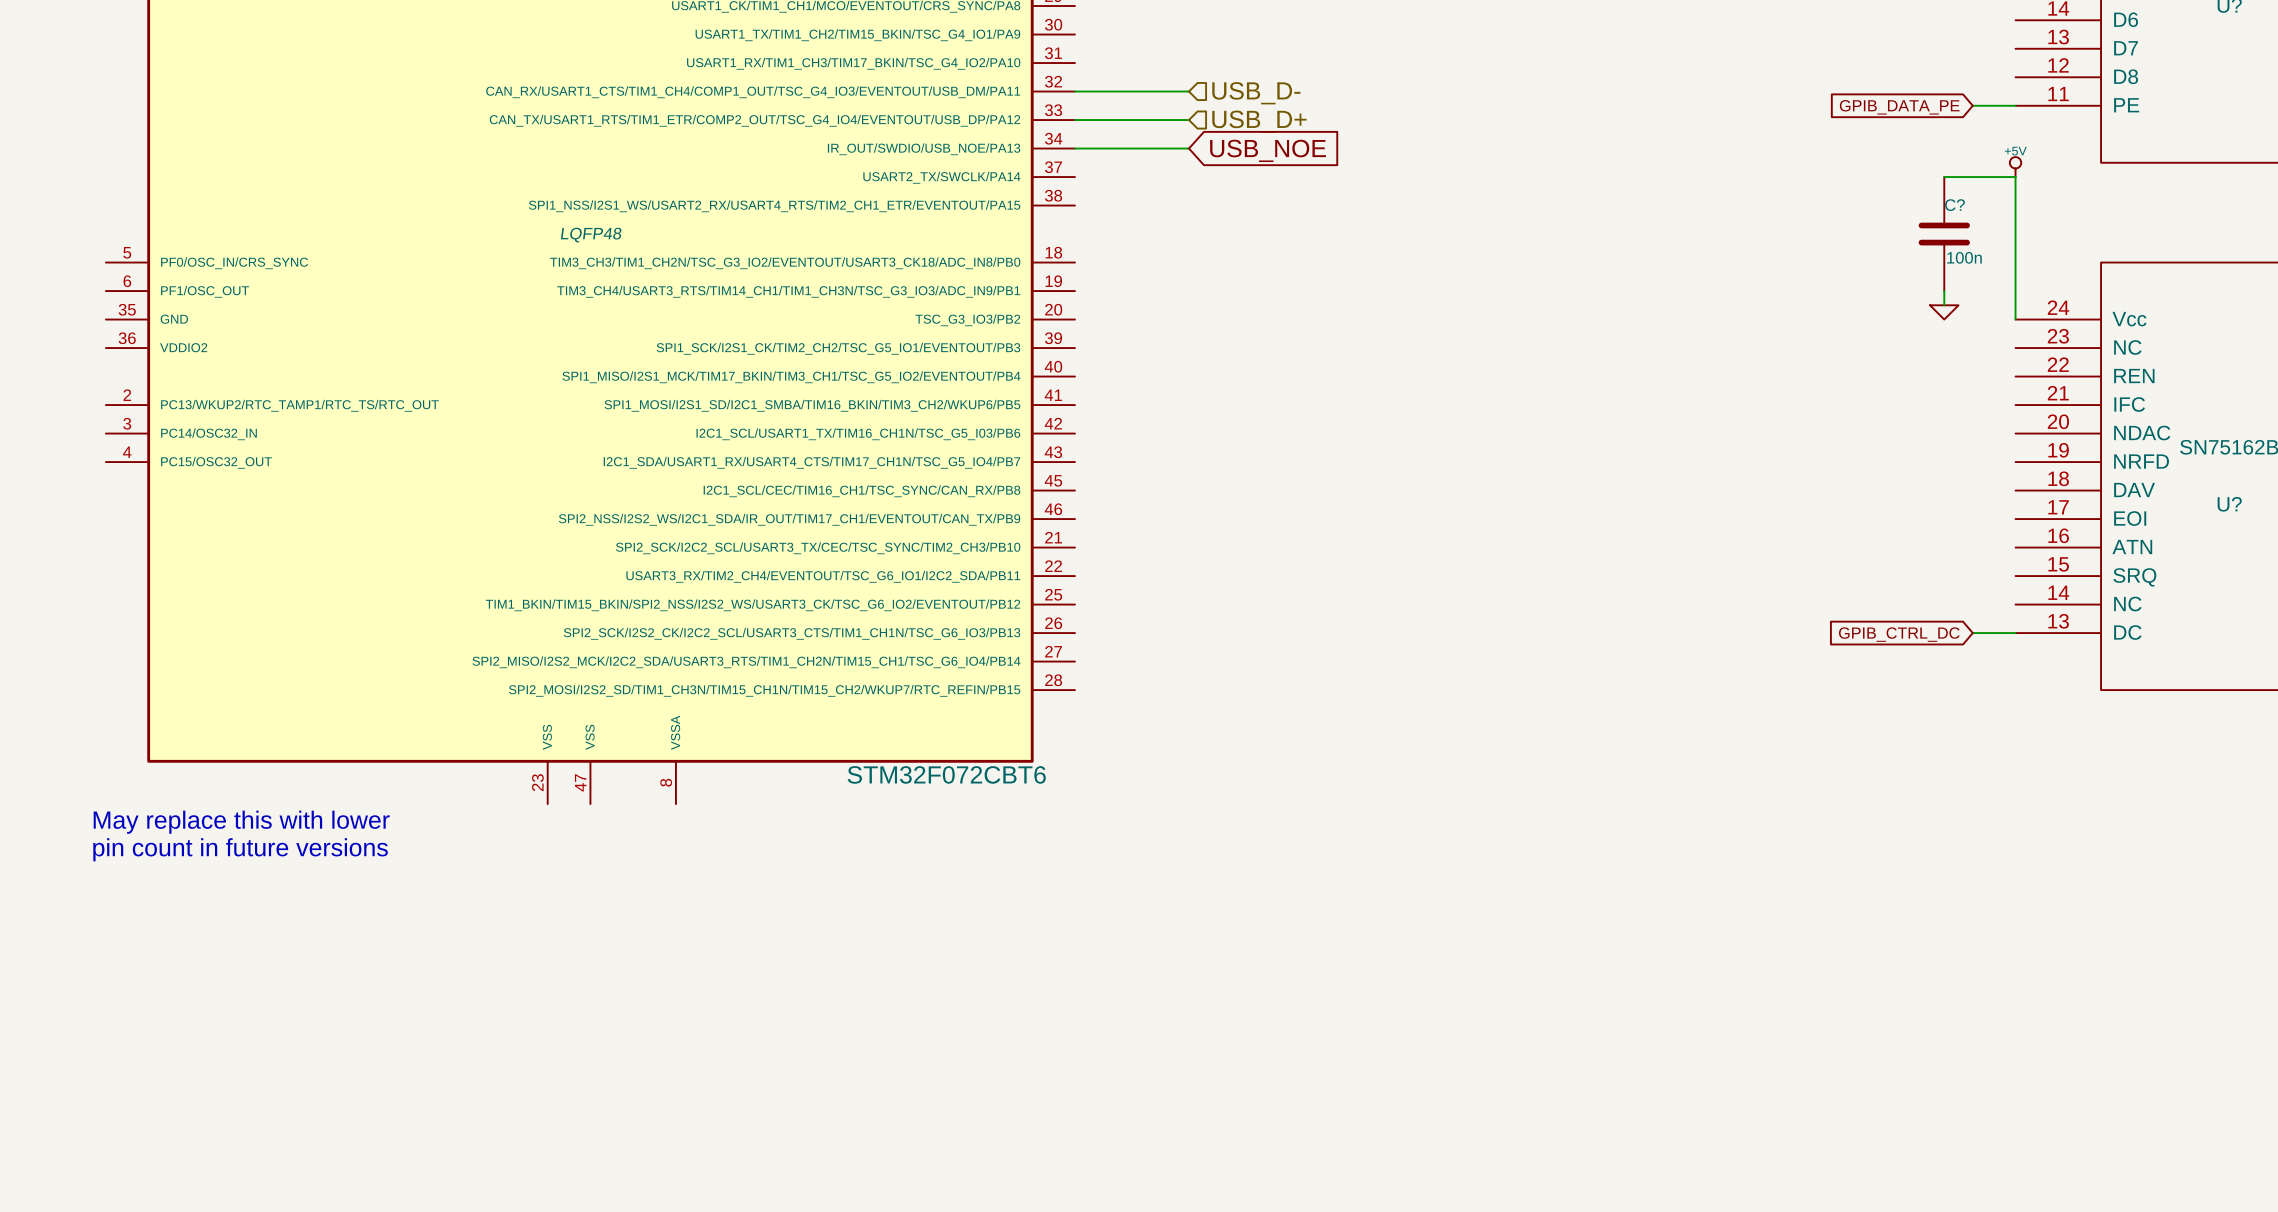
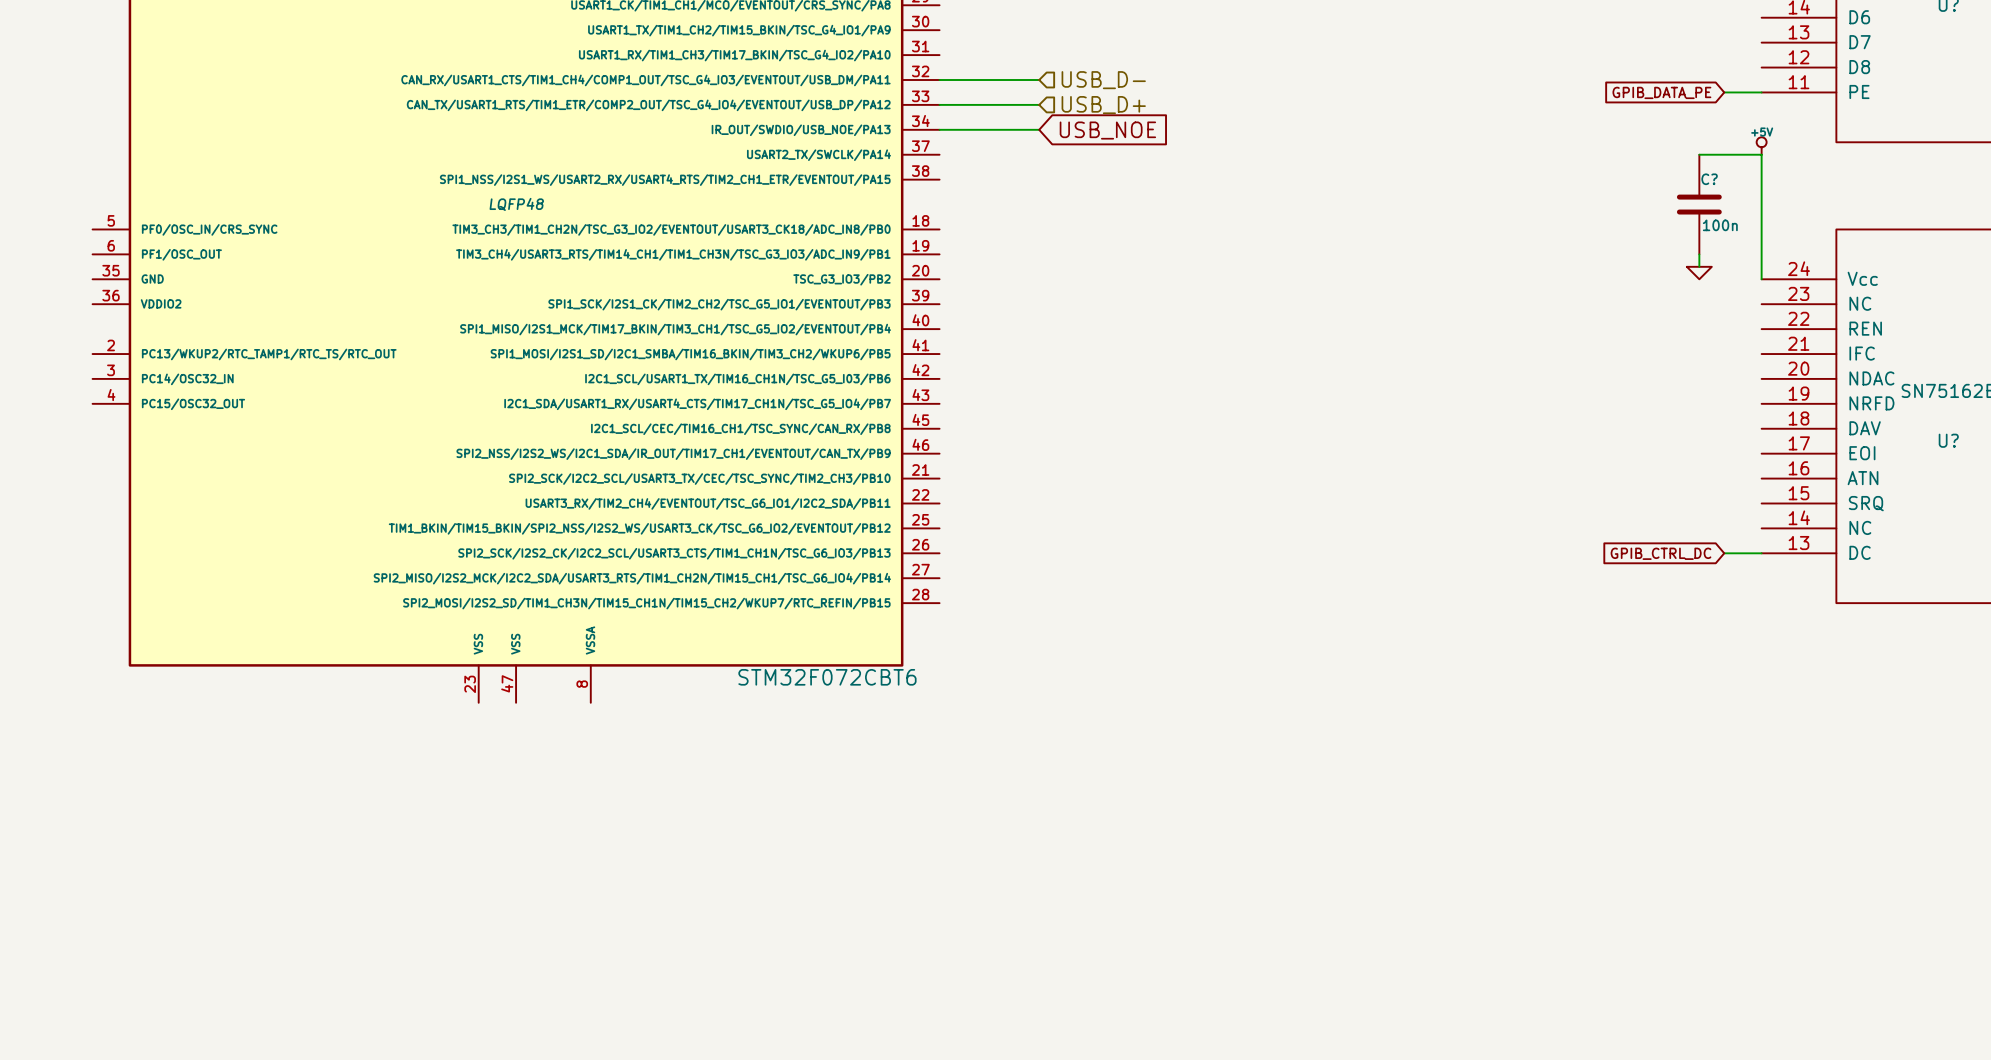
text: May replace this with lower (241, 822) -> none
text: pin count in future versions (240, 849) -> none

